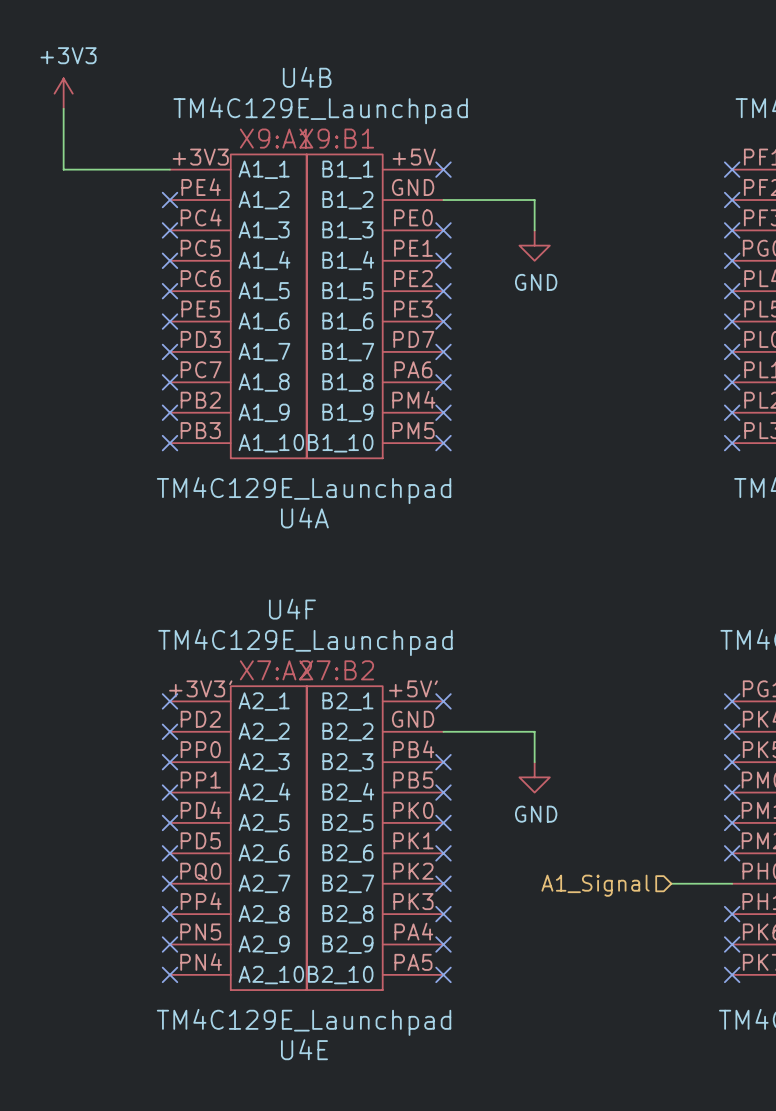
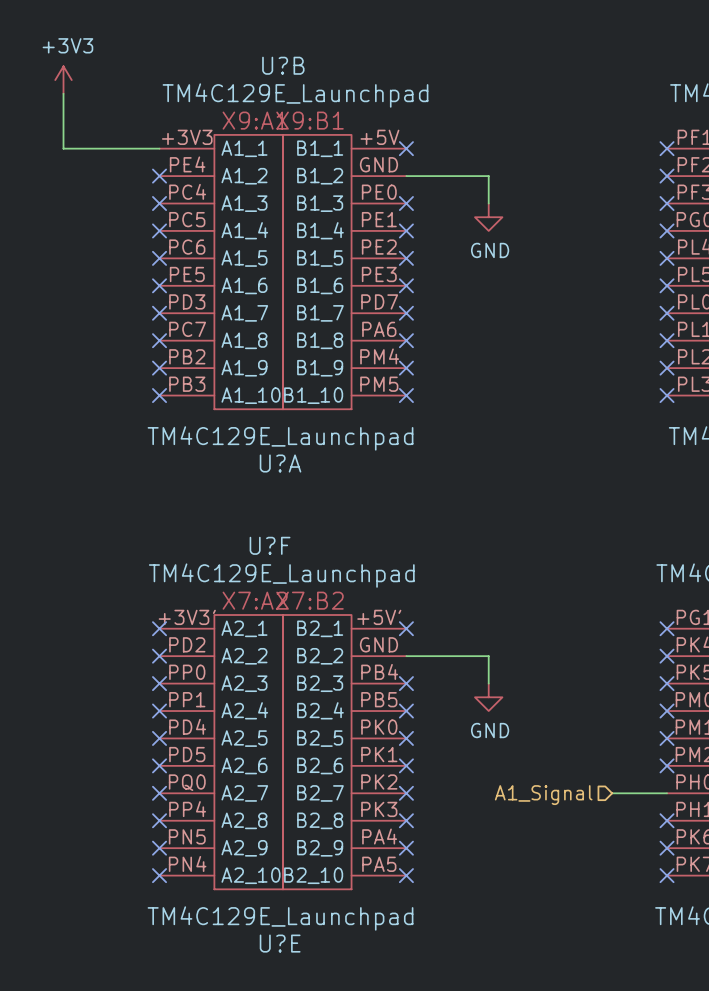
U4B name: U4B (307, 77) -> U?B (283, 65)
U4A name: U4A (304, 517) -> U?A (280, 463)
U4F name: U4F (292, 609) -> U?F (270, 545)
U4E name: U4E (304, 1049) -> U?E (280, 943)

